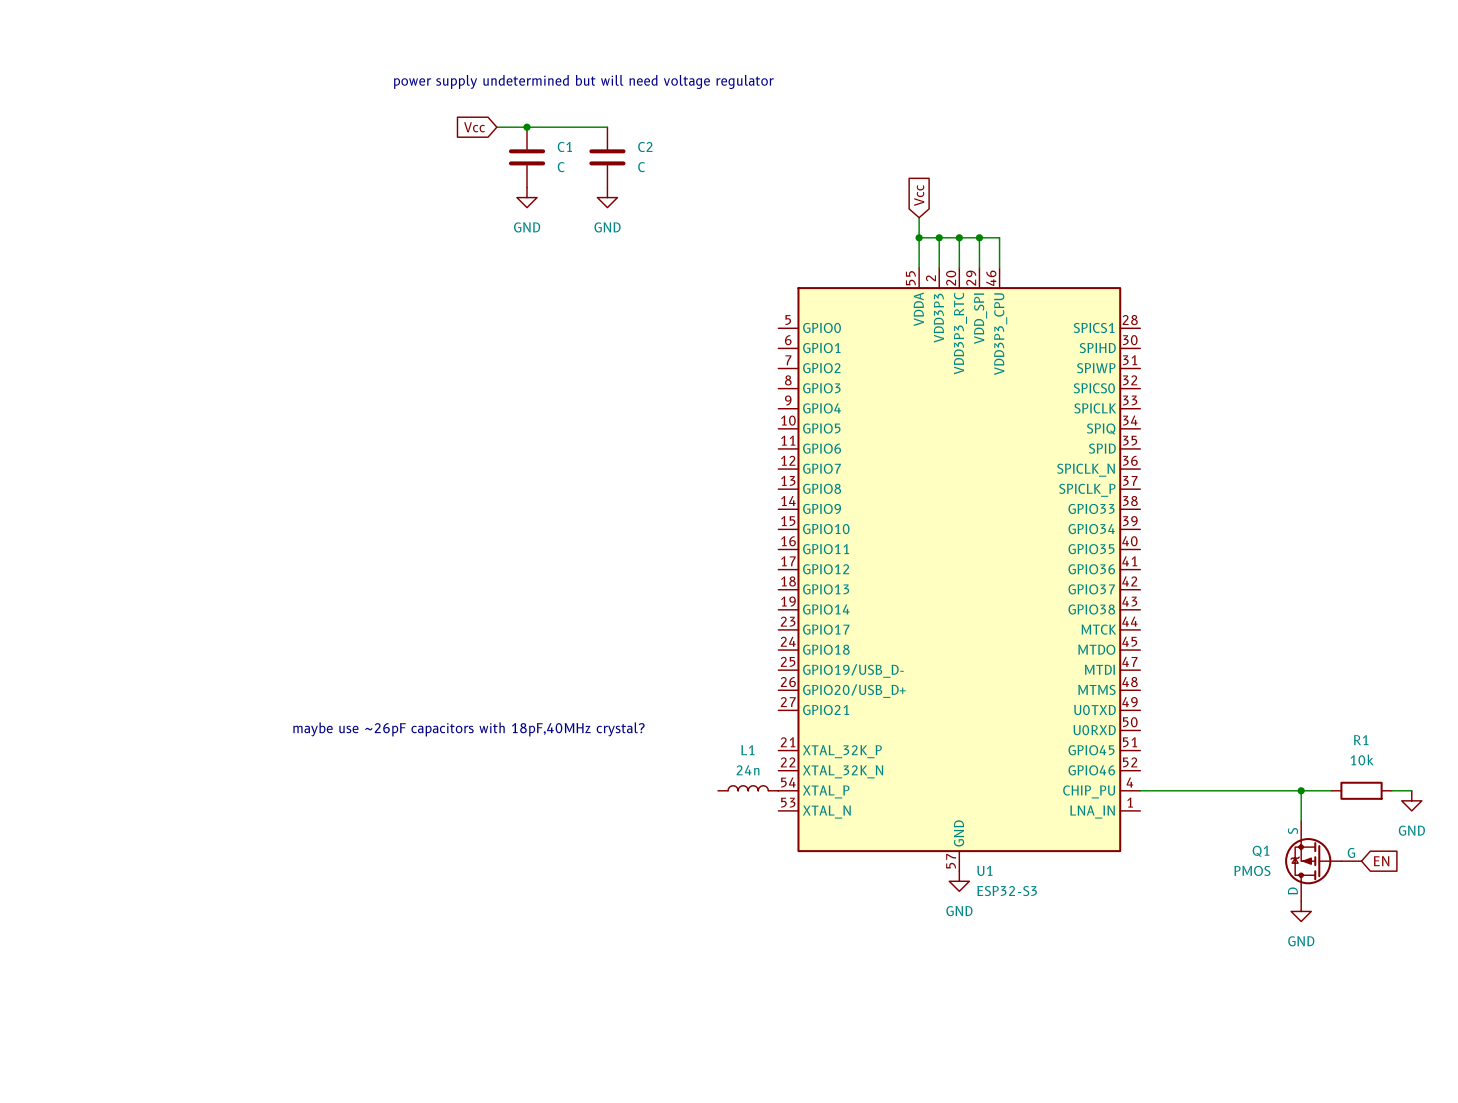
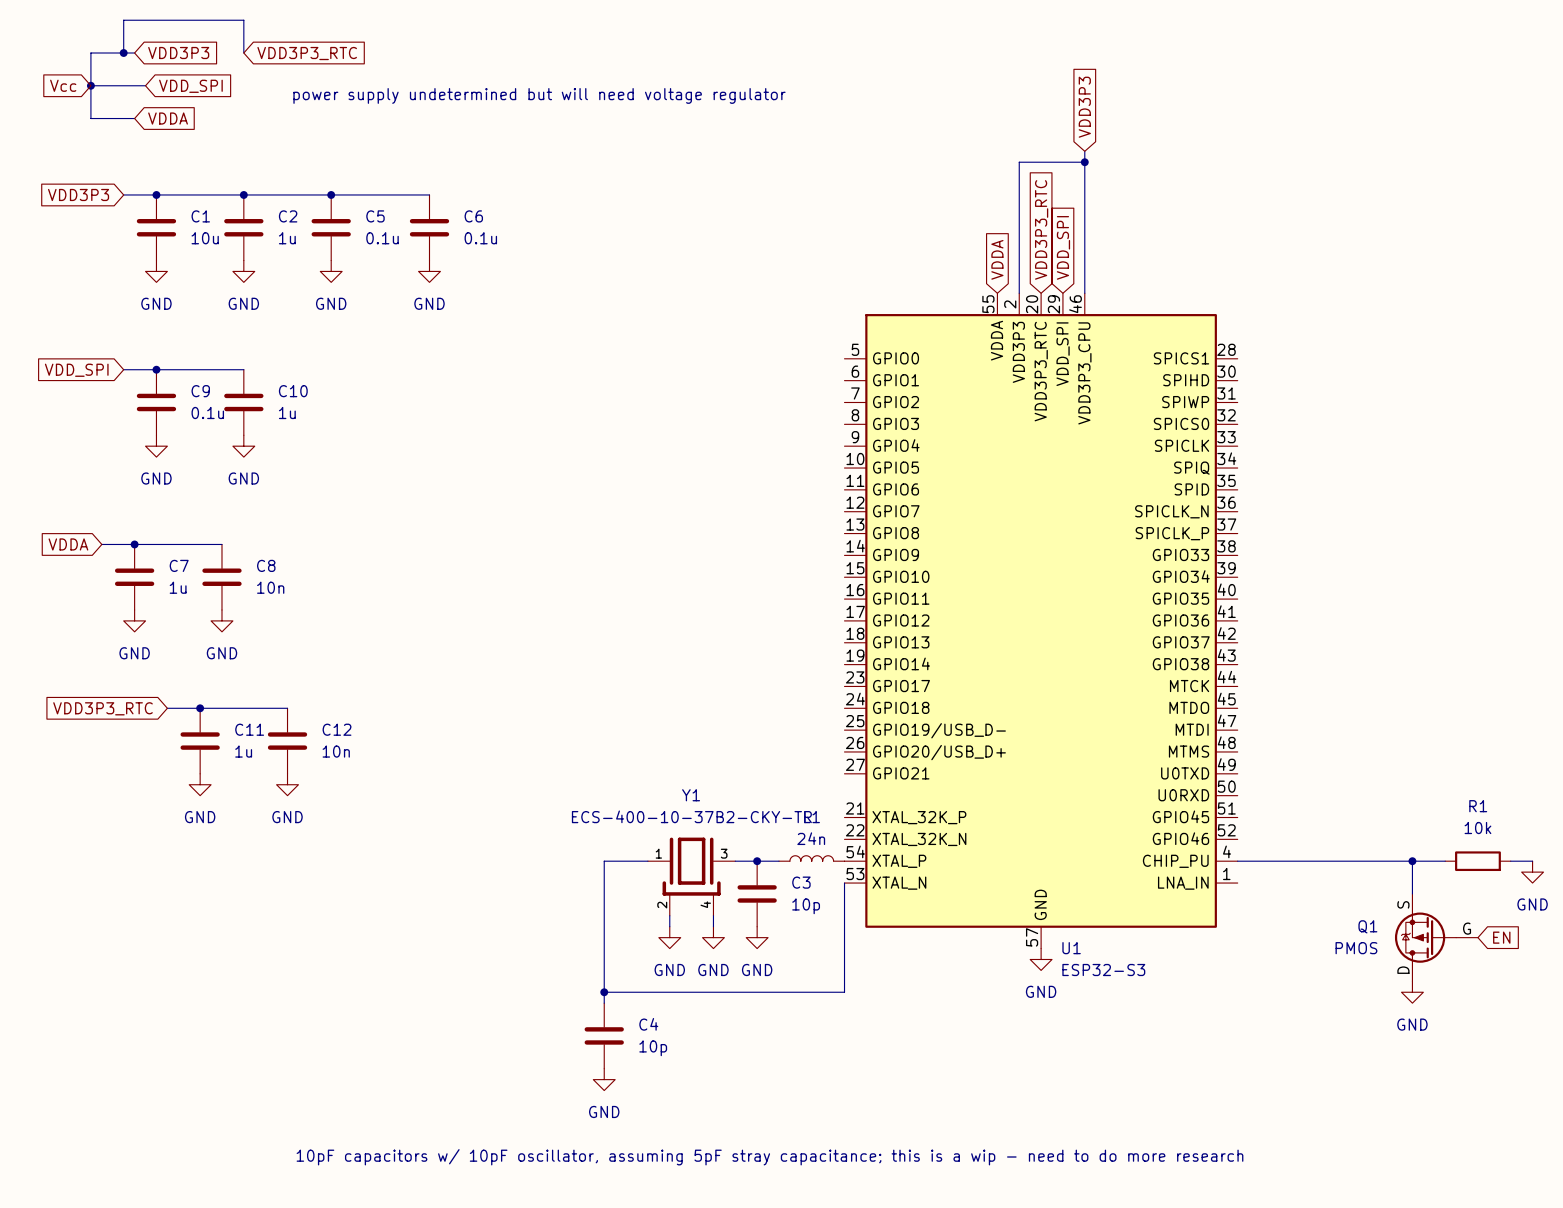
wire: none -> (123, 53) (123, 20) (243, 20) (243, 53)
junction: none -> (123, 53)
wire: none -> (134, 53) (90, 53) (90, 118) (134, 118)
global label: none -> VDD3P3 (178, 53)
global label: none -> VDD3P3_RTC (307, 53)
wire: none -> (90, 85) (145, 85)
junction: none -> (90, 85)
global label: none -> Vcc (63, 85)
global label: none -> VDD_SPI (190, 86)
text position: power supply undetermined but will need voltage regulator (583, 81) -> power supply undetermined but will need voltage regulator (539, 95)
global label: none -> VDD3P3 (1084, 107)
global label: none -> VDDA (168, 118)
global label: Vcc (474, 127) -> none
wire: (496, 127) (607, 127) -> none
junction: (527, 127) -> none
wire: none -> (1084, 162) (1019, 162) (1019, 260)
junction: none -> (1084, 162)
C1 position: (527, 157) -> (156, 227)
C2 position: (607, 157) -> (243, 227)
C1 value: C (561, 167) -> 10u (205, 238)
C2 value: C (641, 167) -> 1u (287, 238)
global label: none -> VDD3P3 (78, 194)
wire: none -> (123, 194) (429, 194)
junction: none -> (156, 194)
junction: none -> (243, 194)
junction: none -> (331, 194)
global label: Vcc (919, 195) -> none
power symbol: GND (527, 197) -> none
power symbol: GND (607, 197) -> none
C5: none -> 0.1u (331, 227)
C6: none -> 0.1u (429, 227)
global label: none -> VDD3P3_RTC (1041, 229)
wire: (919, 217) (919, 267) -> none
global label: none -> VDD_SPI (1063, 247)
wire: (919, 237) (999, 237) -> (1084, 151) (1084, 260)
junction: (919, 237) -> none
junction: (939, 237) -> none
wire: (959, 237) (959, 267) -> none
junction: (959, 237) -> none
wire: (979, 237) (979, 267) -> none
junction: (979, 237) -> none
global label: none -> VDDA (997, 259)
power symbol: none -> GND (156, 271)
power symbol: none -> GND (243, 271)
power symbol: none -> GND (331, 271)
power symbol: none -> GND (429, 271)
wire: none -> (123, 369) (243, 369)
junction: none -> (156, 369)
global label: none -> VDD_SPI (76, 370)
C9: none -> 0.1u (156, 402)
C10: none -> 1u (243, 402)
power symbol: none -> GND (156, 446)
power symbol: none -> GND (243, 446)
global label: none -> VDDA (68, 544)
wire: none -> (101, 544) (221, 544)
junction: none -> (134, 544)
C7: none -> 1u (134, 577)
C8: none -> 10n (221, 577)
power symbol: none -> GND (134, 620)
power symbol: none -> GND (221, 620)
wire: none -> (167, 708) (287, 708)
junction: none -> (200, 708)
global label: none -> VDD3P3_RTC (103, 708)
C11: none -> 1u (200, 741)
C12: none -> 10n (287, 741)
power symbol: none -> GND (200, 784)
power symbol: none -> GND (287, 784)
text: maybe use ~26pF capacitors with 18pF,40MHz crystal? (469, 729) -> none
wire: none -> (647, 861) (604, 861) (604, 1003)
wire: none -> (735, 861) (778, 861)
junction: none -> (757, 861)
Y1: none -> ECS-400-10-37B2-CKY-TR (691, 876)
wire: none -> (844, 883) (844, 992) (604, 992)
C3: none -> 10p (757, 893)
wire: none -> (669, 915) (669, 926)
wire: none -> (713, 915) (713, 926)
power symbol: none -> GND (669, 937)
power symbol: none -> GND (713, 937)
power symbol: none -> GND (757, 937)
junction: none -> (604, 992)
C4: none -> 10p (604, 1035)
power symbol: none -> GND (604, 1079)
text: none -> 10pF capacitors w/ 10pF oscillator, assuming 5pF stray capacitance; this is a wip - need to do more research (769, 1157)

